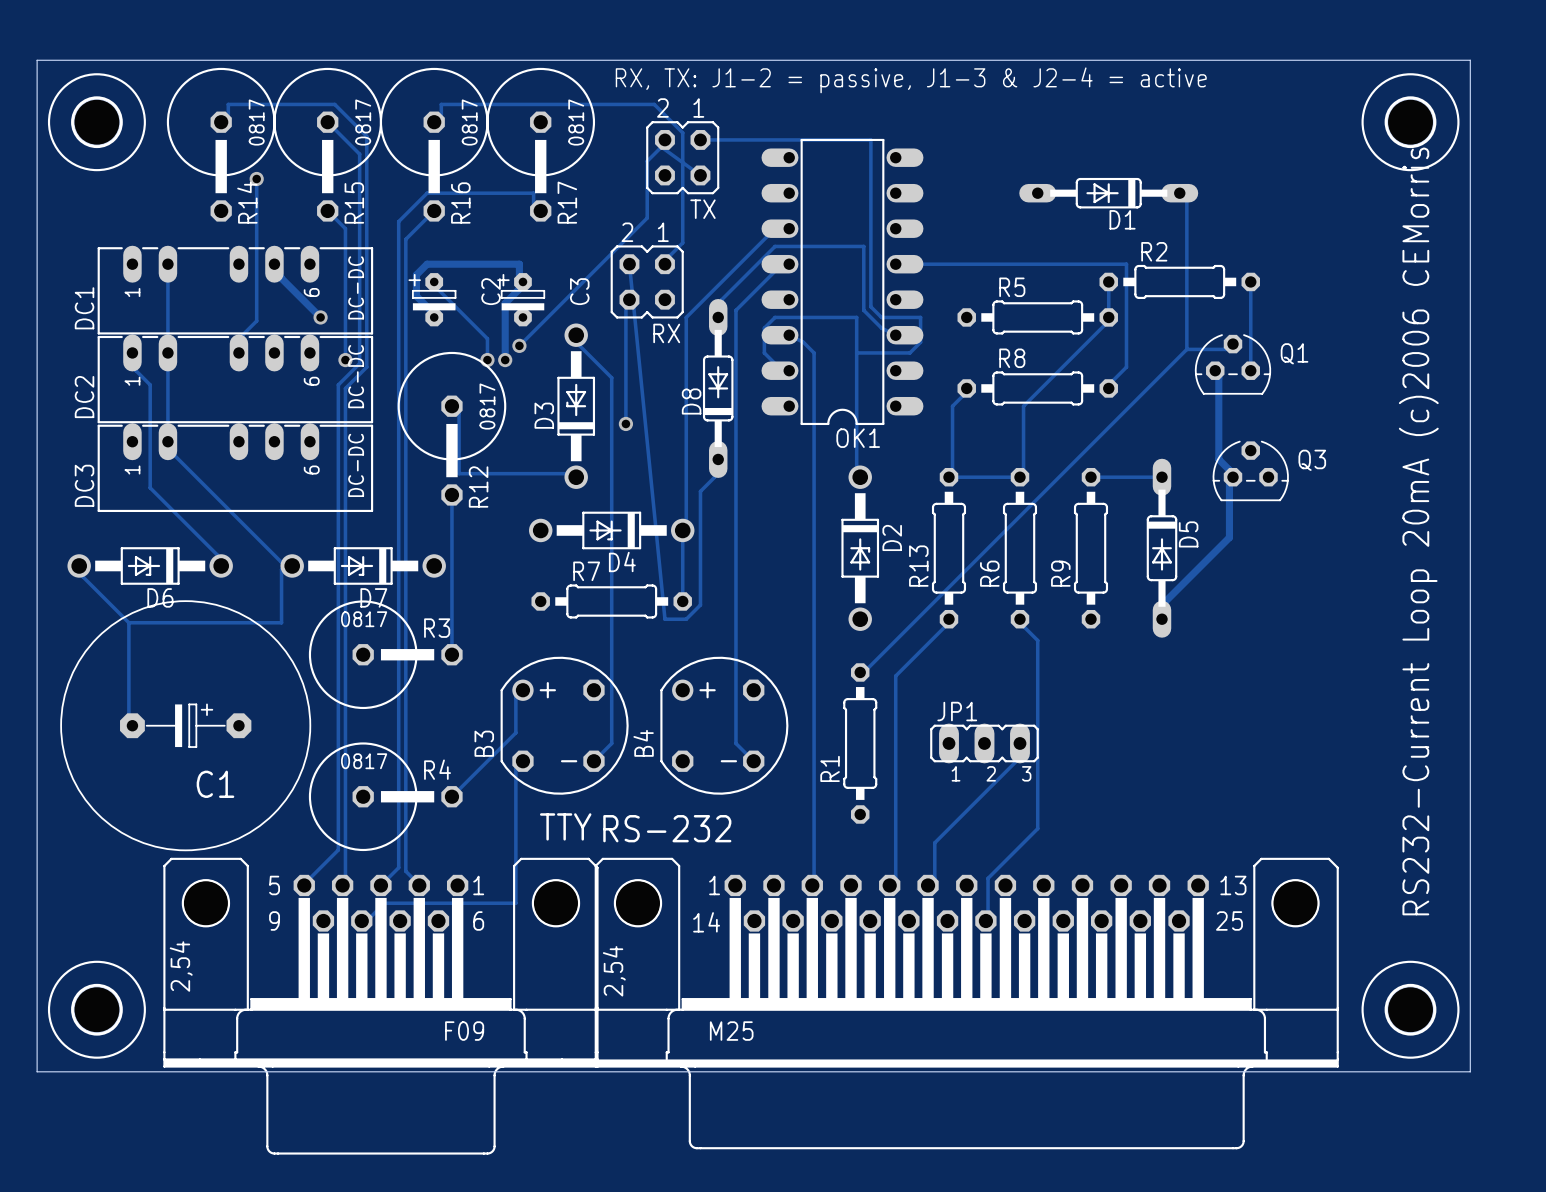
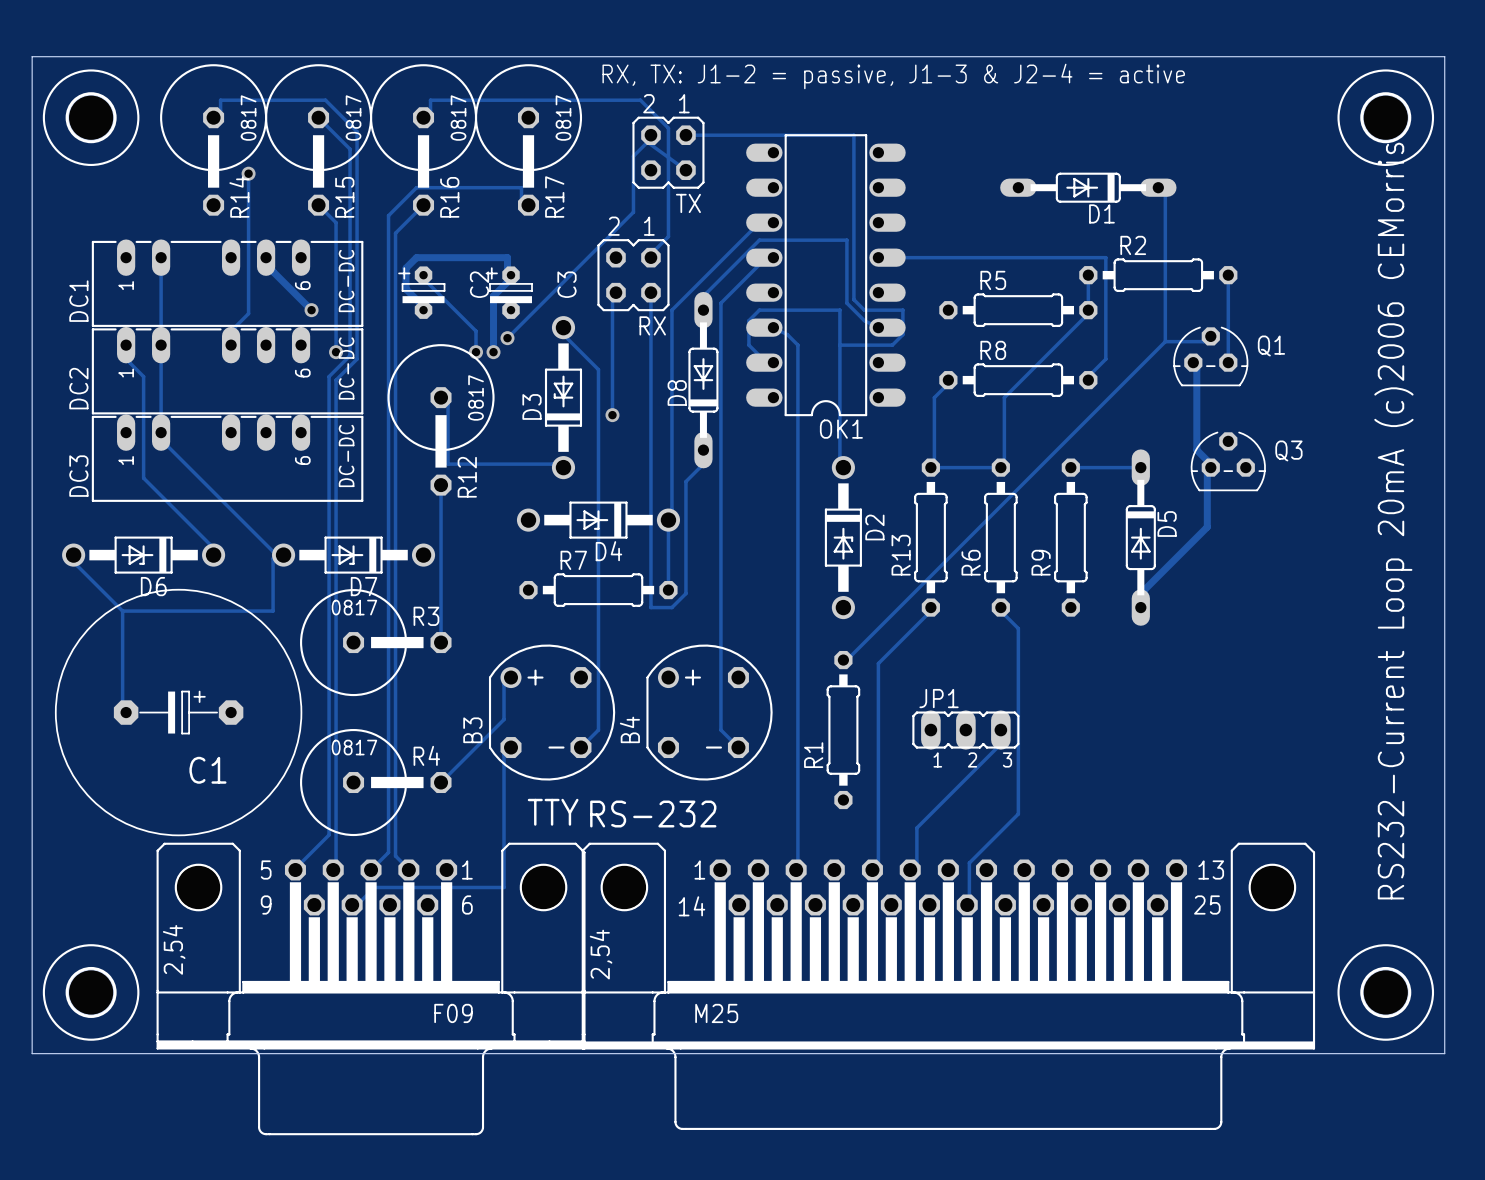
track: (629, 264) (664, 619) -> (650, 292) (650, 607)

